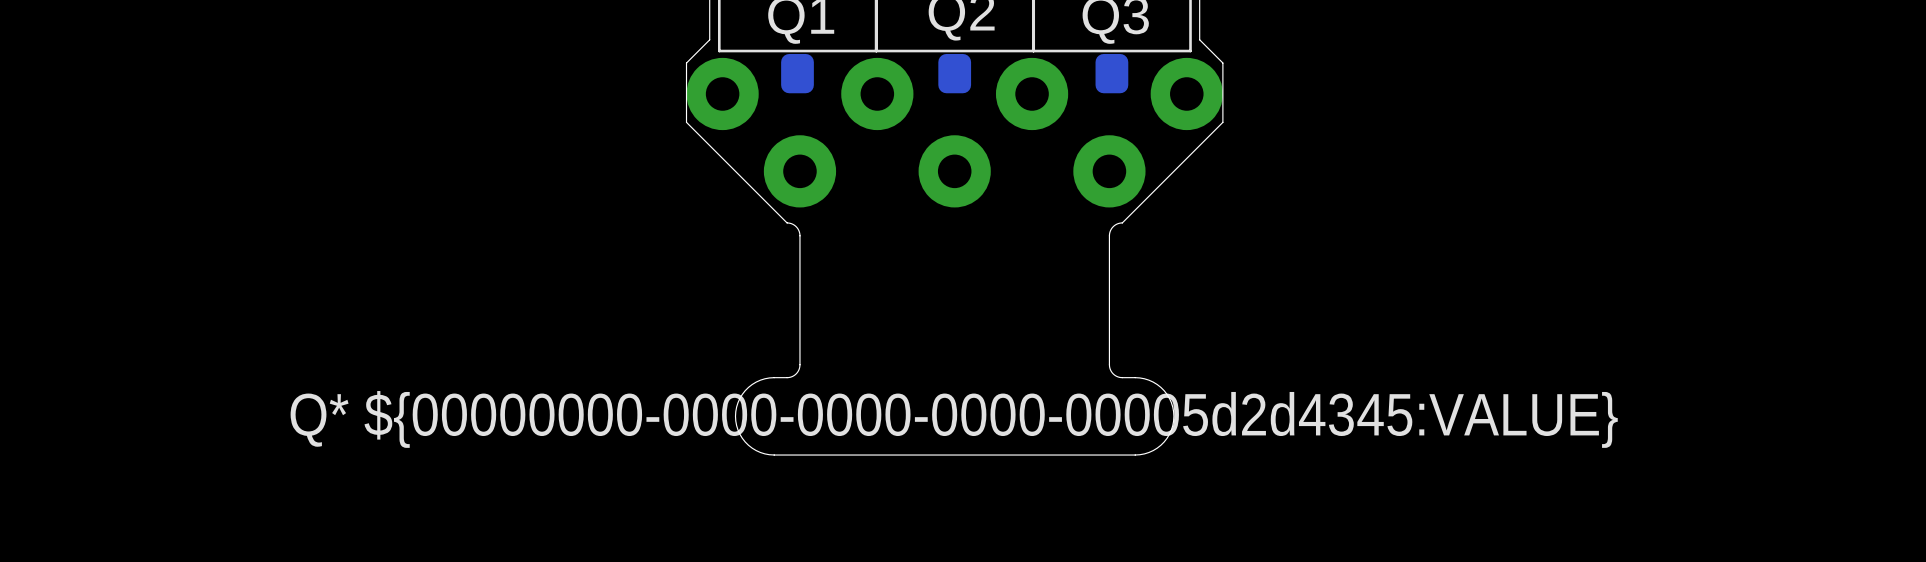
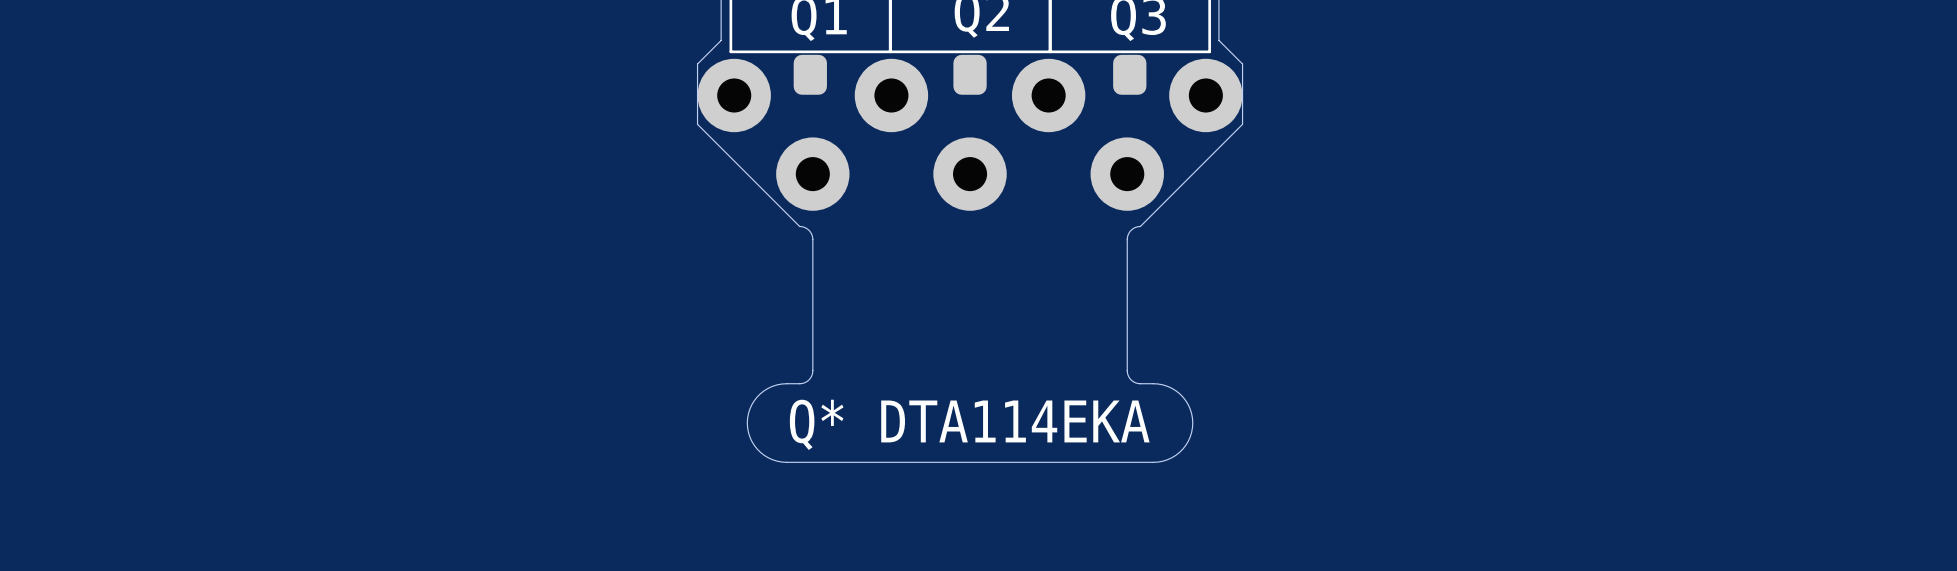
text: Q* ${00000000-0000-0000-0000-00005d2d4345:VALUE} (954, 419) -> Q* DTA114EKA (969, 424)

